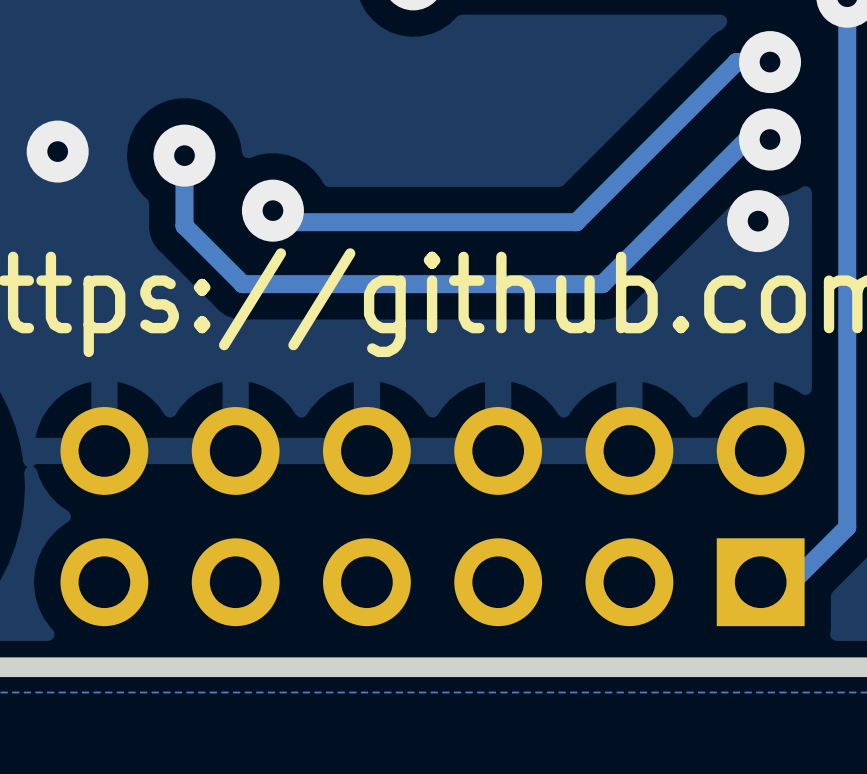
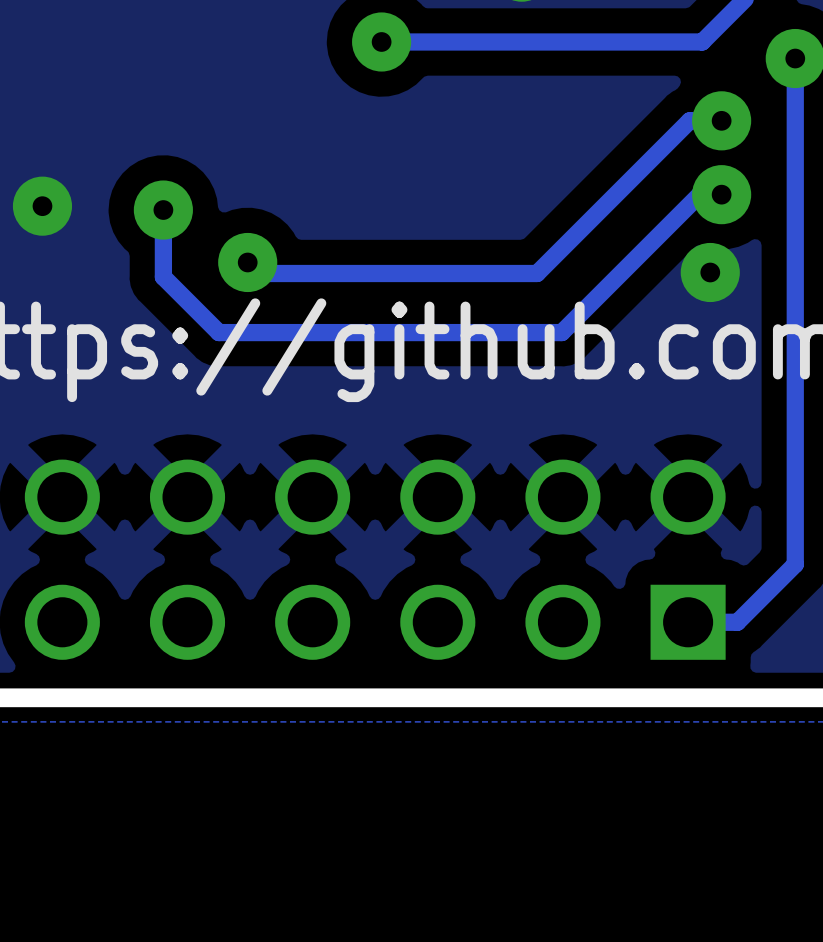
part footprint: [60, 407, 805, 627] -> [24, 459, 726, 660]

